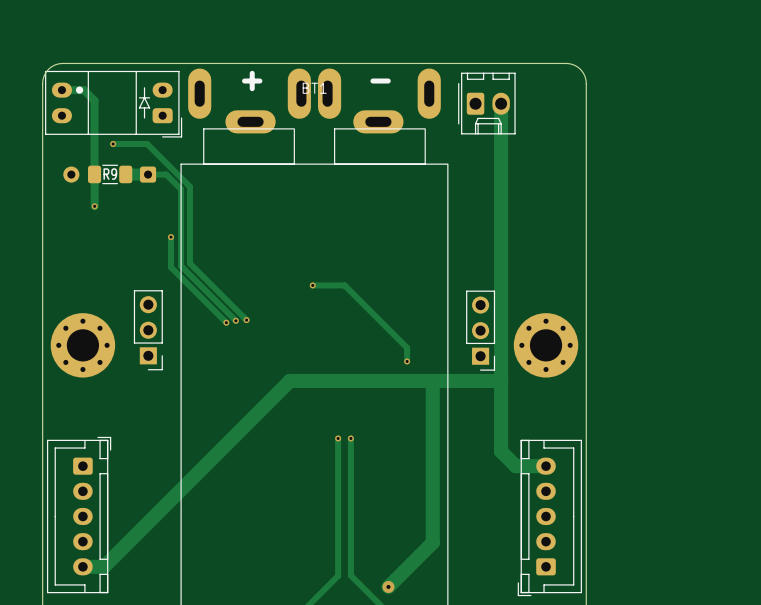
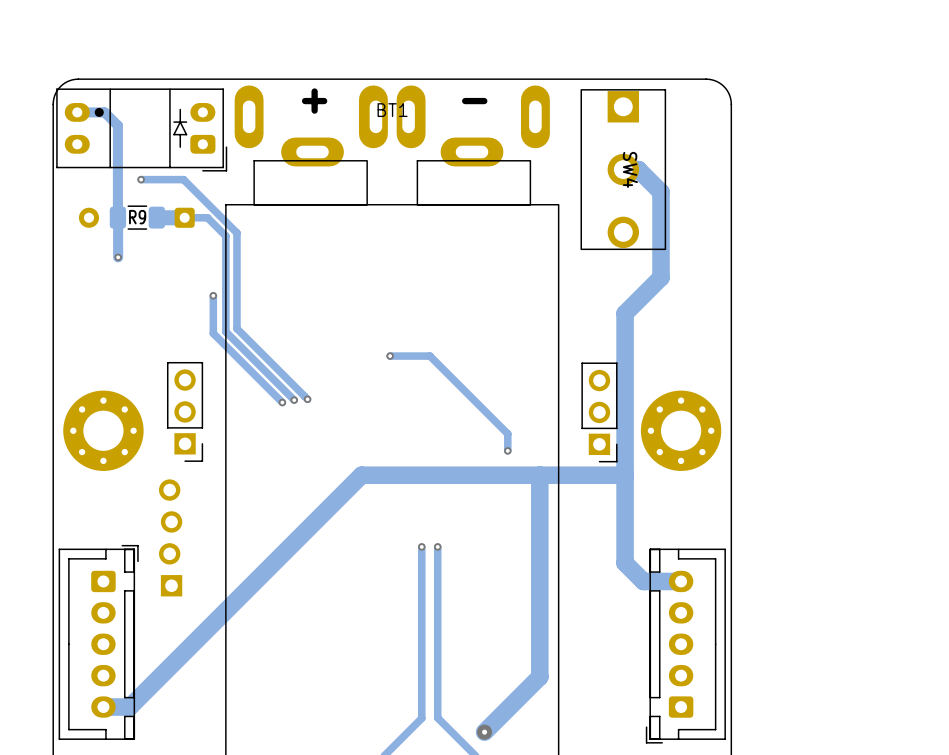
part: (486, 103) -> none
track: (501, 103) (501, 251) -> (623, 169) (638, 169) (660, 192) (660, 277) (625, 313)
SW4: none -> (623, 169)
part: none -> (170, 537)

